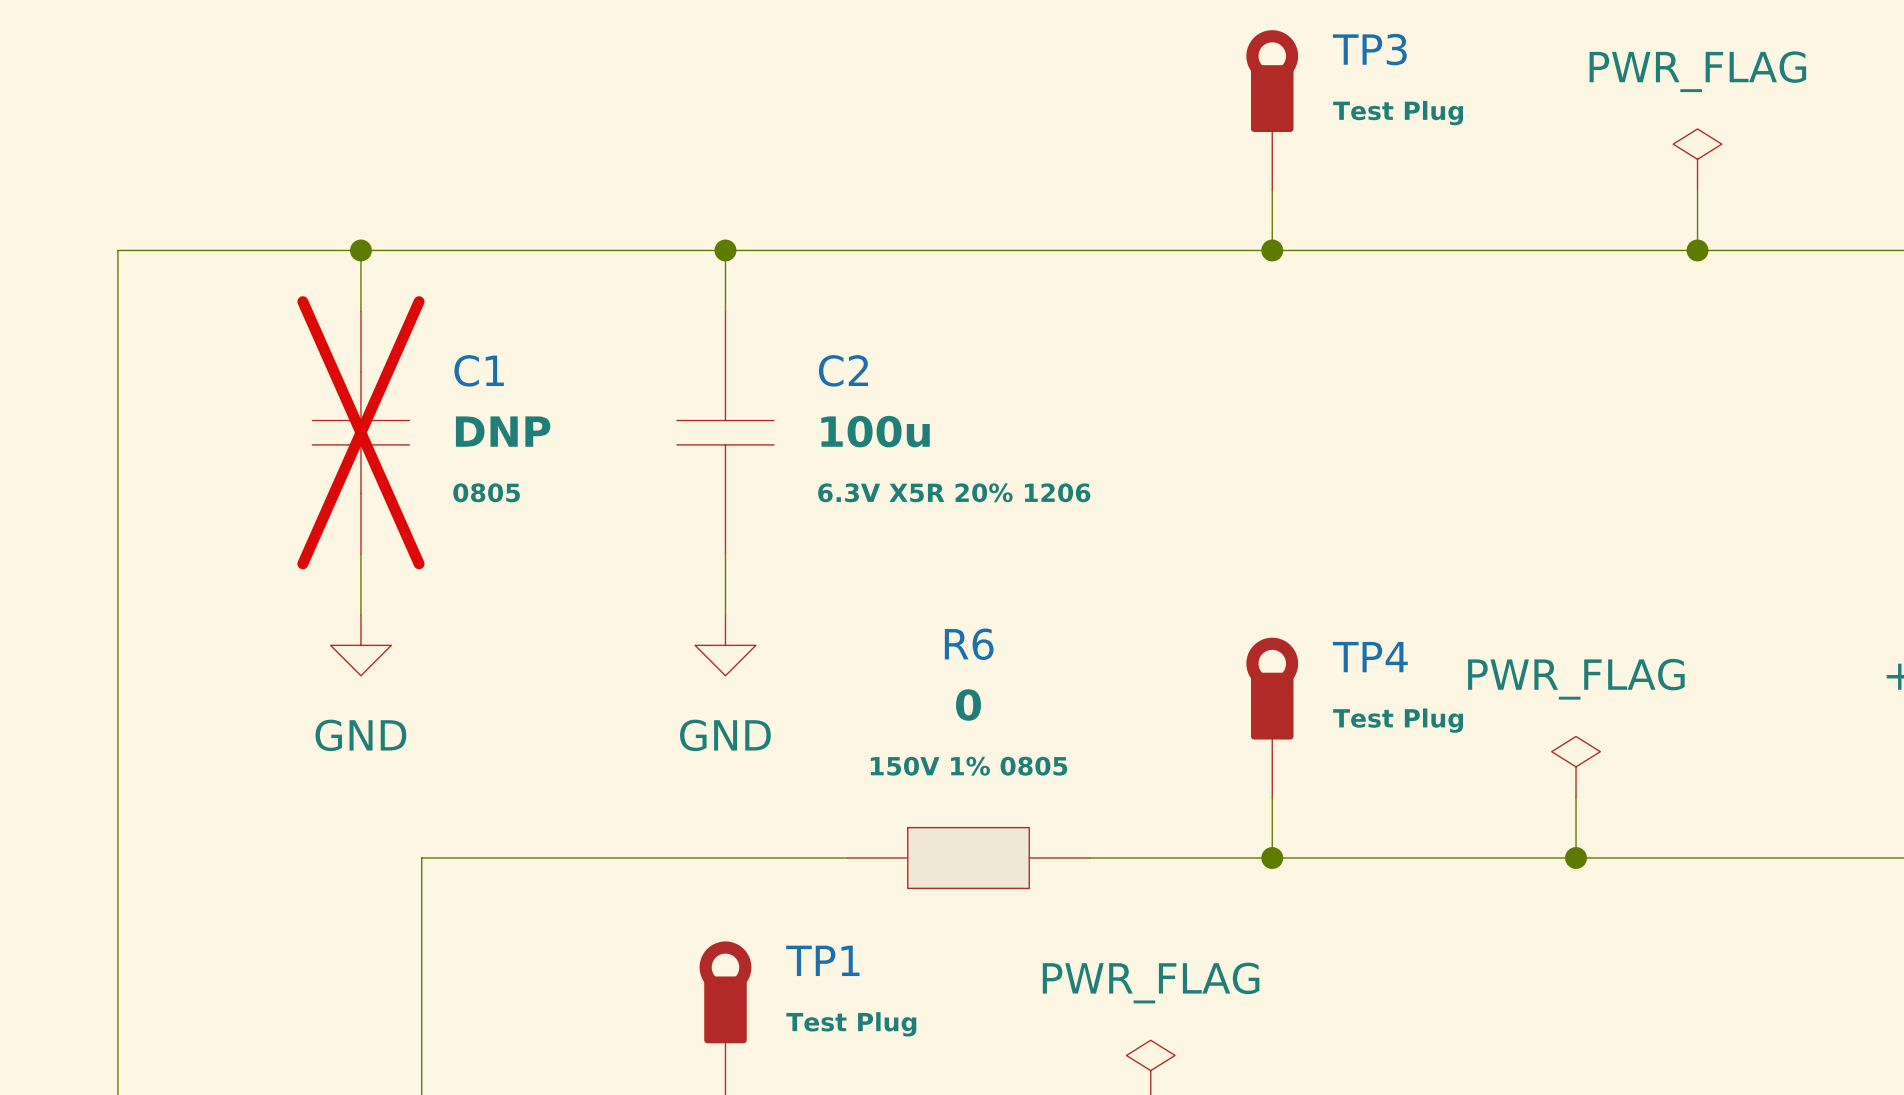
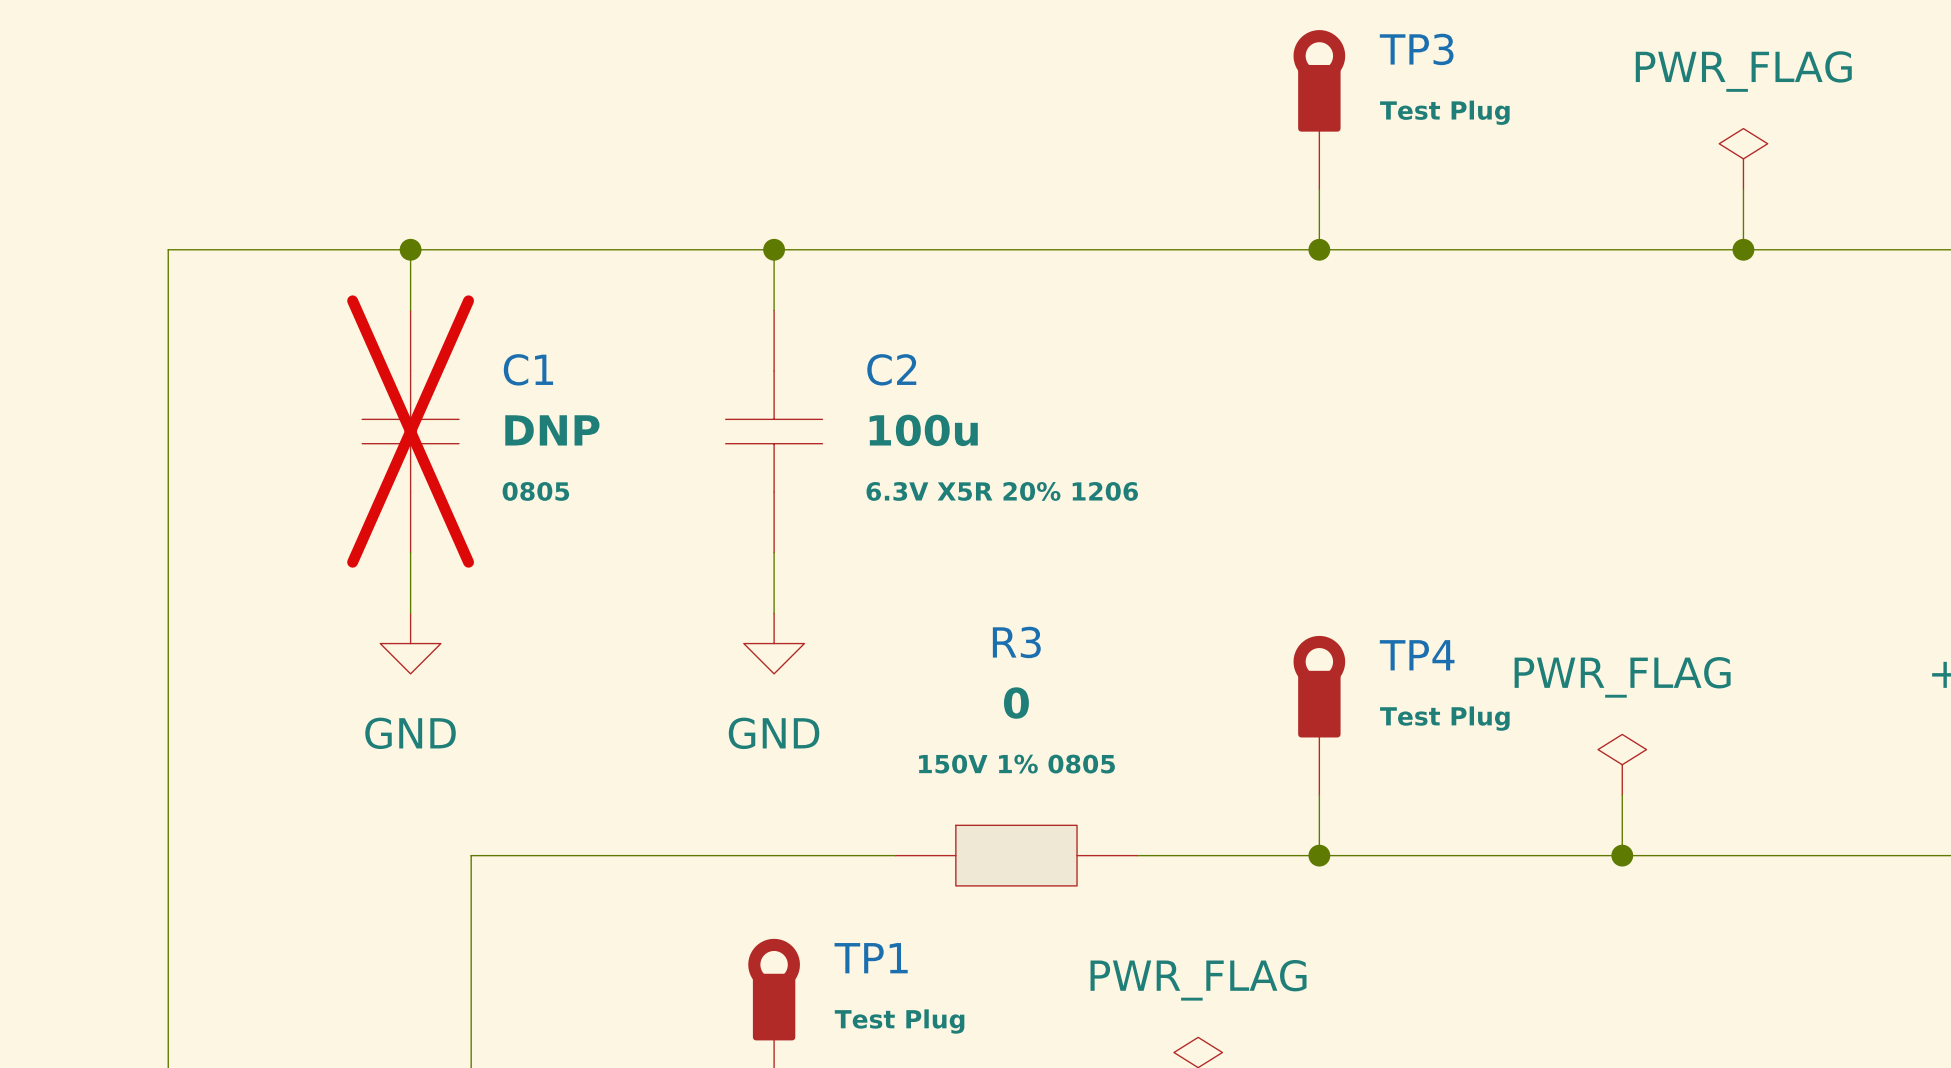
R6 name: R6 (969, 644) -> R3 (1016, 642)

